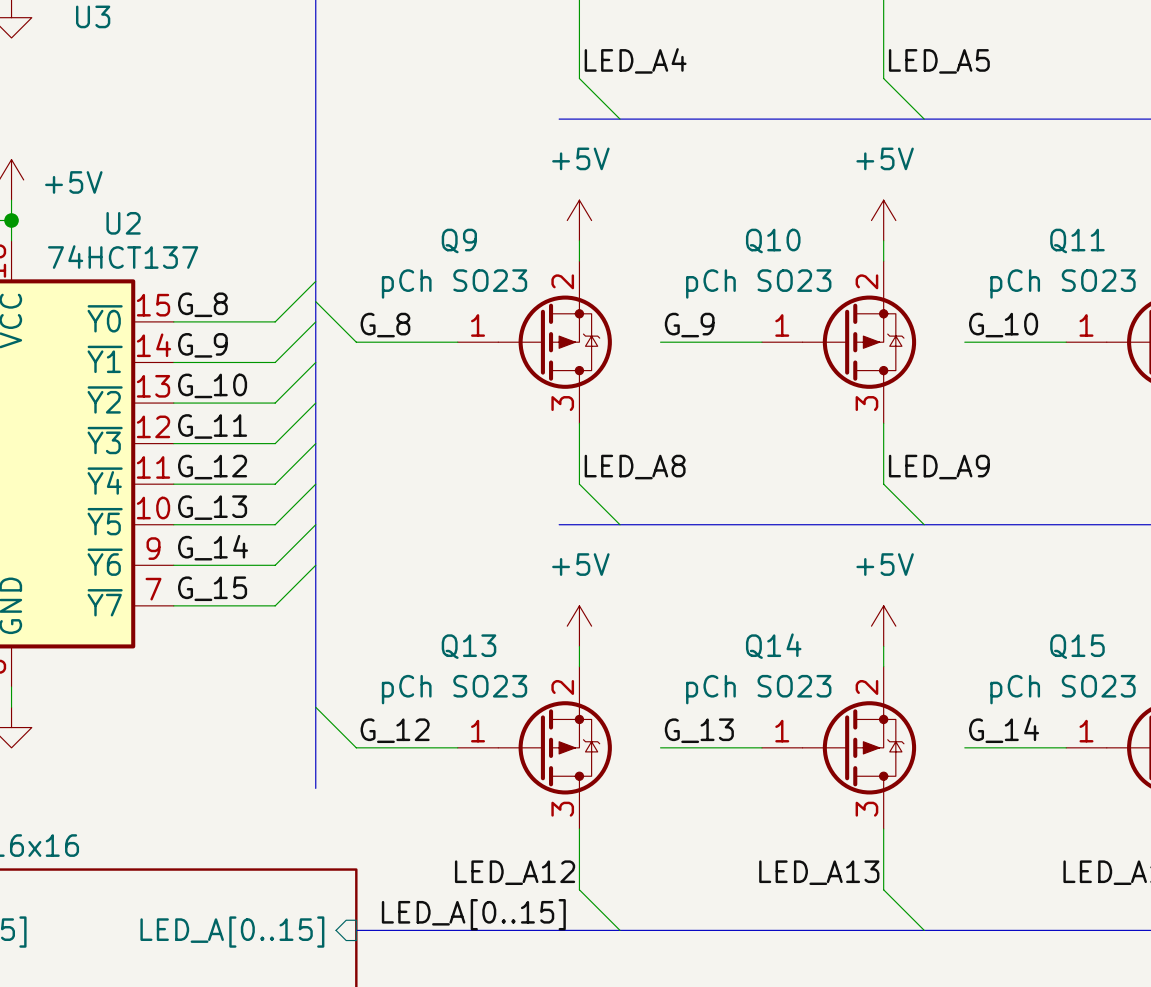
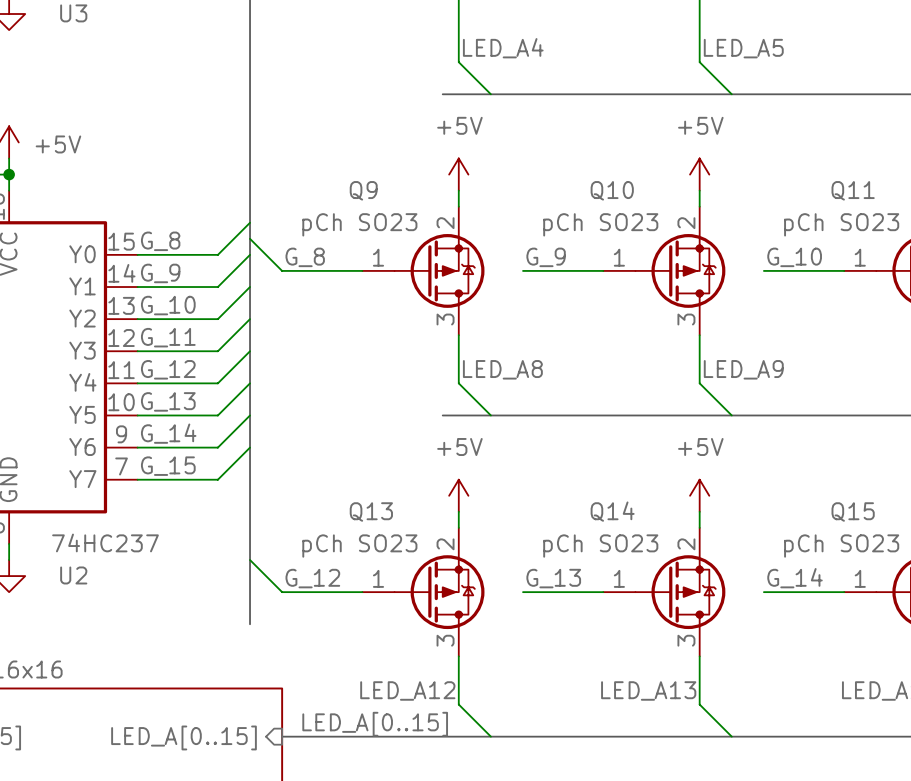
U2 name position: U2 (123, 223) -> U2 (73, 575)
U2 value: 74HCT137 (123, 257) -> 74HC237 (105, 542)
U2 pin name: ~{Y0} (105, 318) -> Y0 (82, 254)
U2 pin name: ~{Y1} (105, 359) -> Y1 (82, 286)
U2 pin name: ~{Y2} (105, 399) -> Y2 (82, 318)
U2 pin name: ~{Y3} (105, 440) -> Y3 (82, 350)
U2 pin name: ~{Y4} (105, 481) -> Y4 (82, 382)
U2 pin name: ~{Y5} (105, 521) -> Y5 (82, 414)
U2 pin name: ~{Y6} (105, 562) -> Y6 (82, 447)
U2 pin name: ~{Y7} (105, 602) -> Y7 (82, 479)

